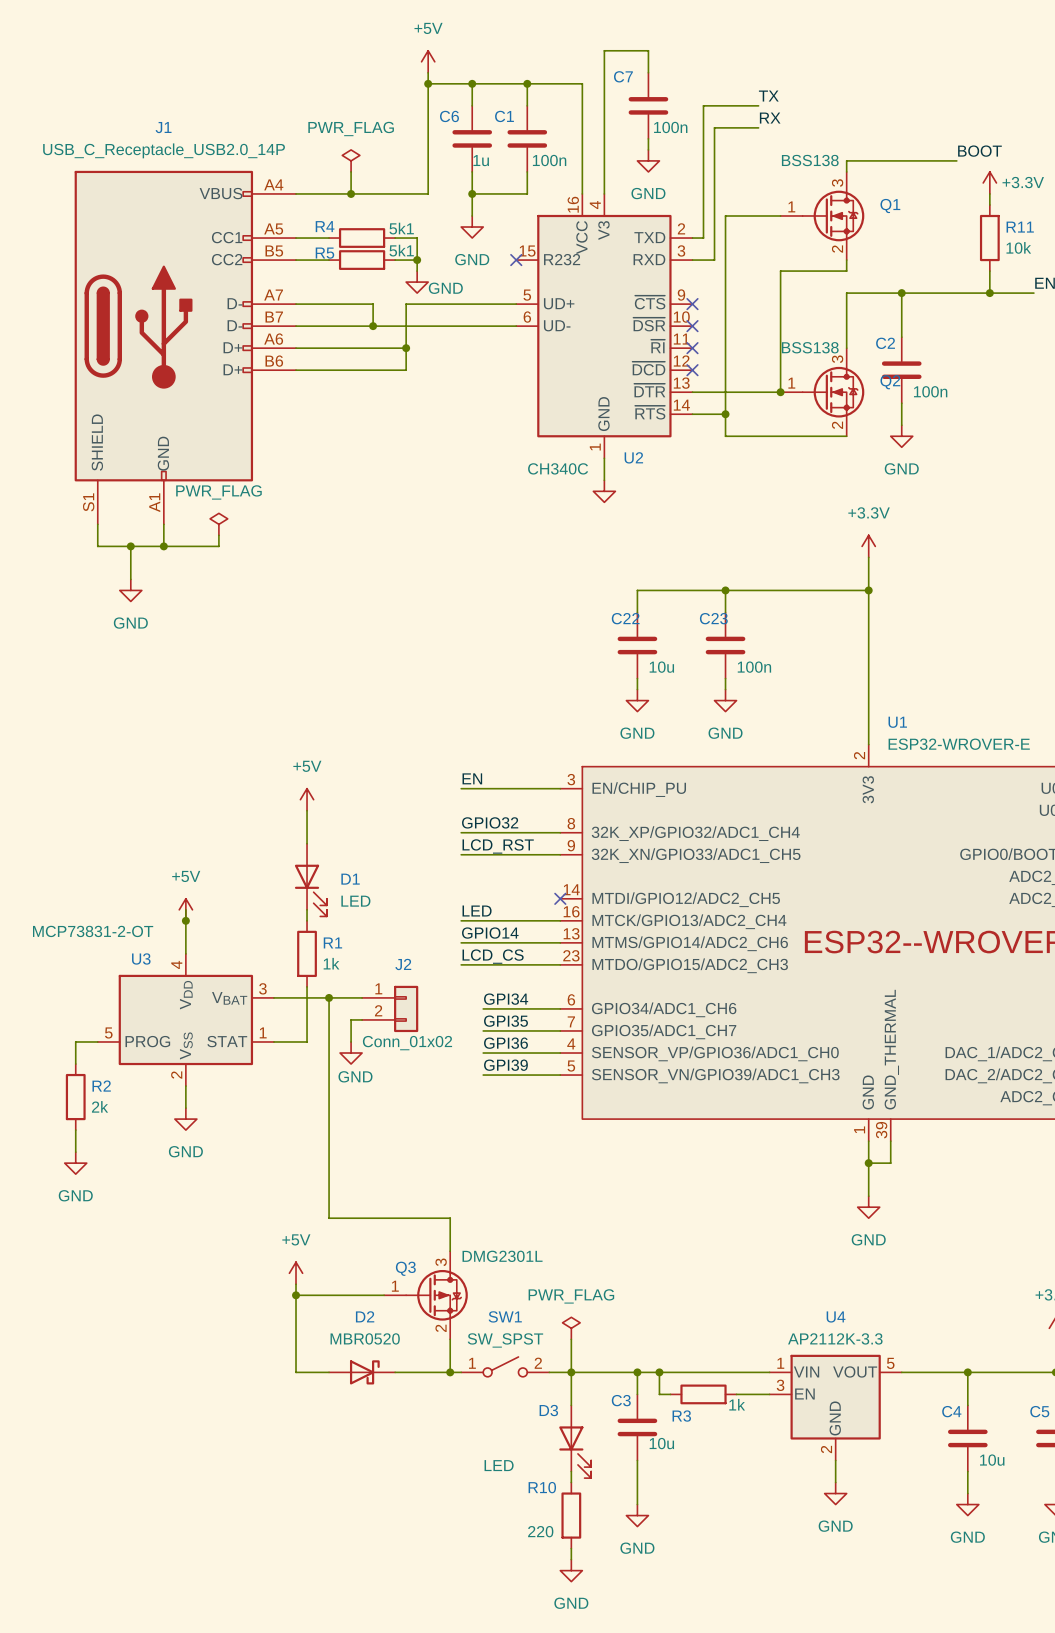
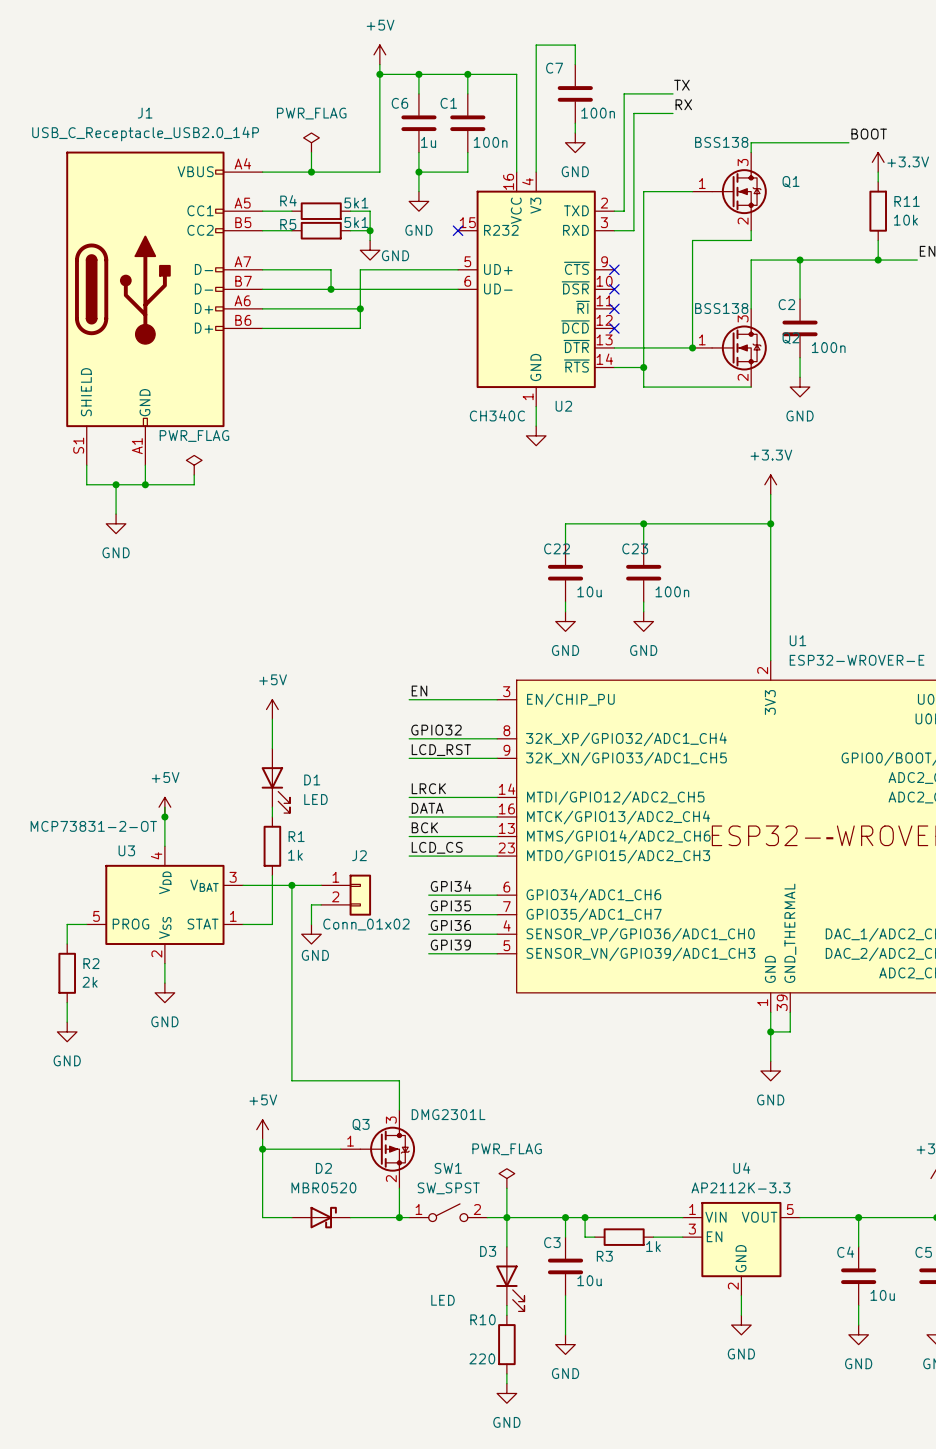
label: none -> LRCK (428, 788)
wire: none -> (409, 797) (497, 797)
no-connect mark: (560, 898) -> none
label: LED (477, 911) -> DATA (427, 808)
label: GPIO14 (490, 933) -> BCK (424, 827)

